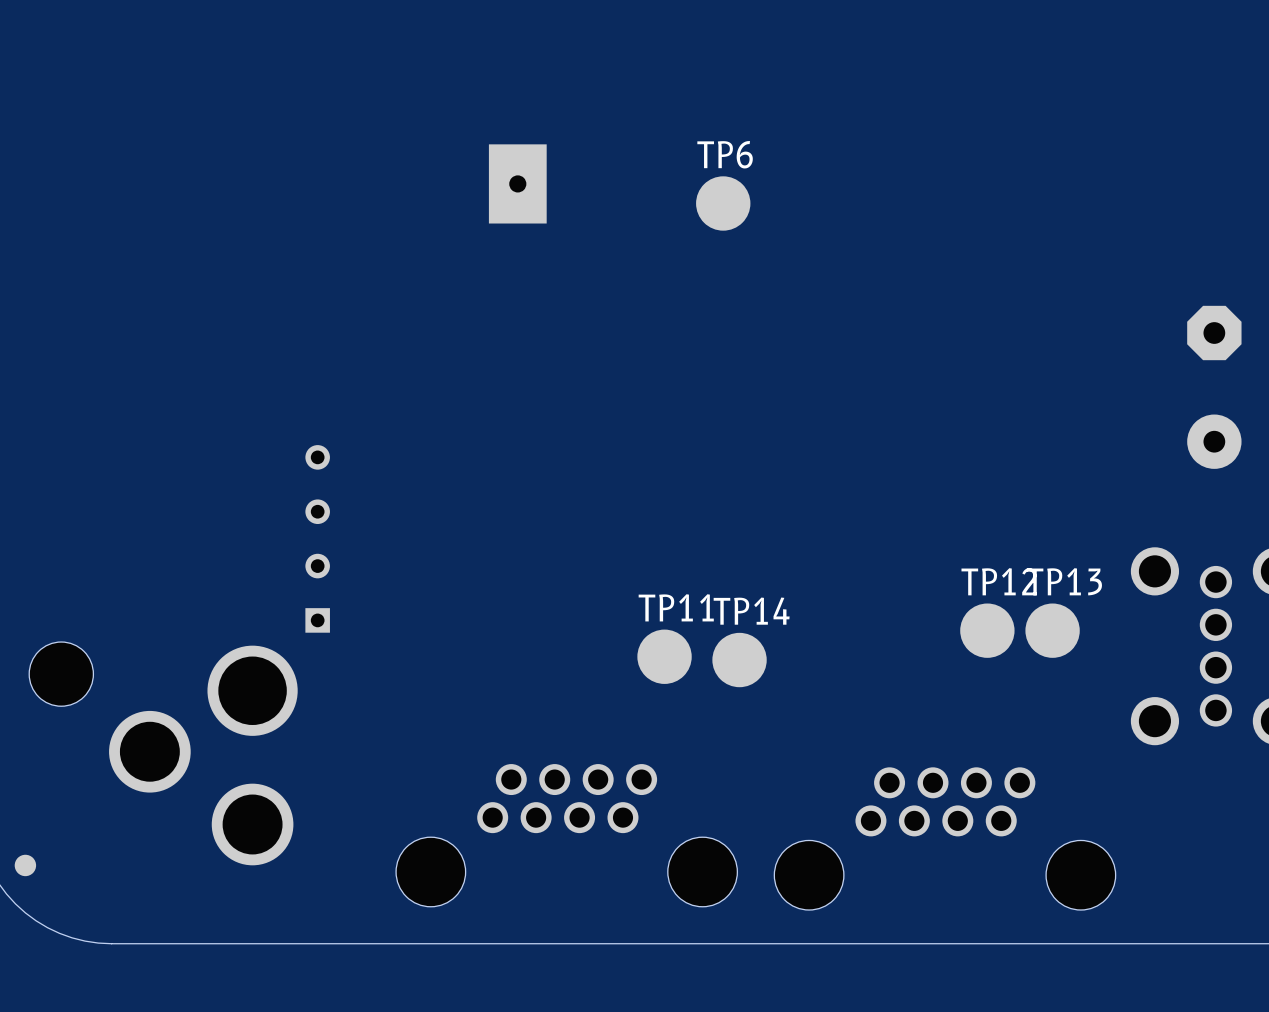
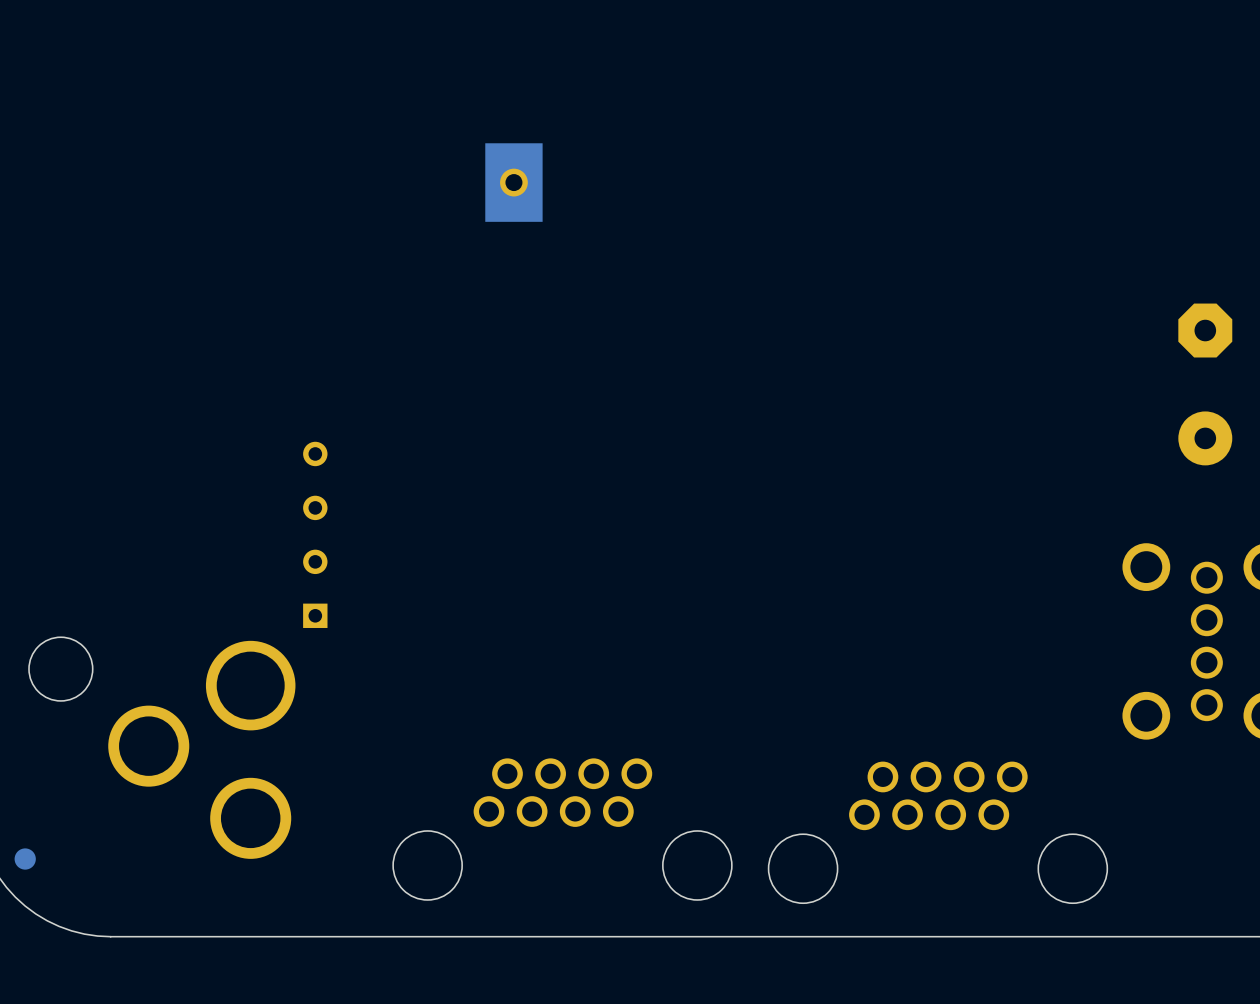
TP6: (723, 203) -> none
TP12: (987, 630) -> none
TP13: (1052, 630) -> none
TP11: (664, 656) -> none
TP14: (739, 660) -> none

